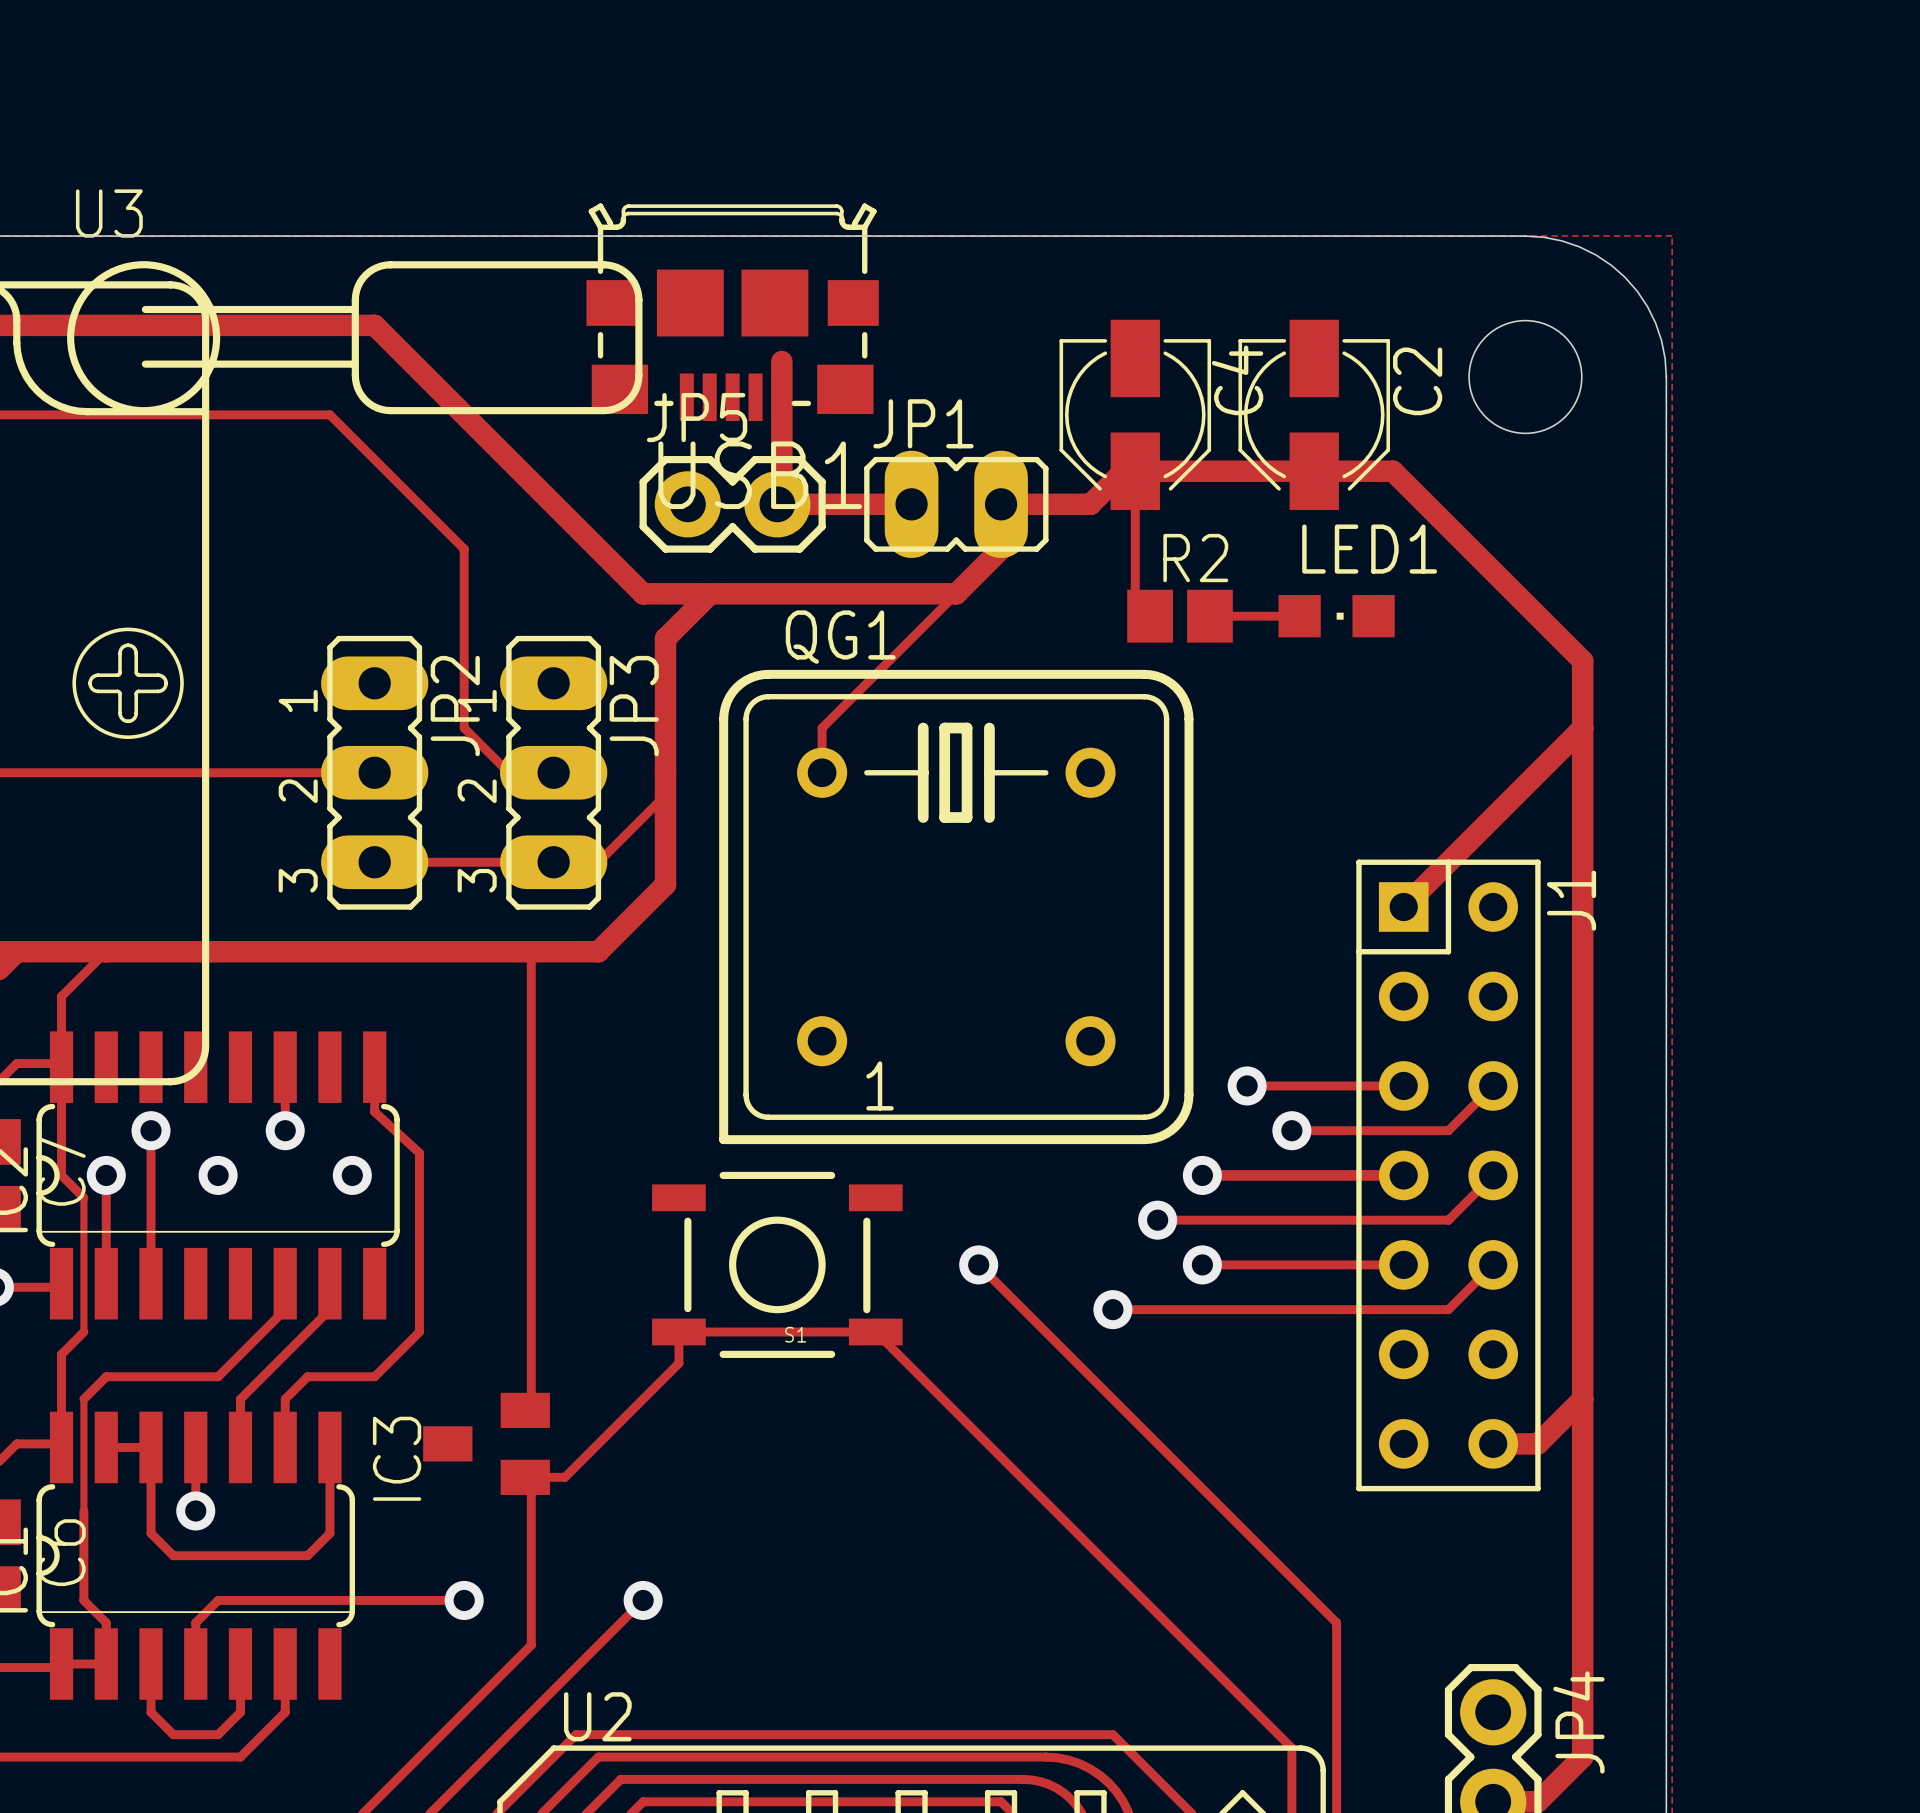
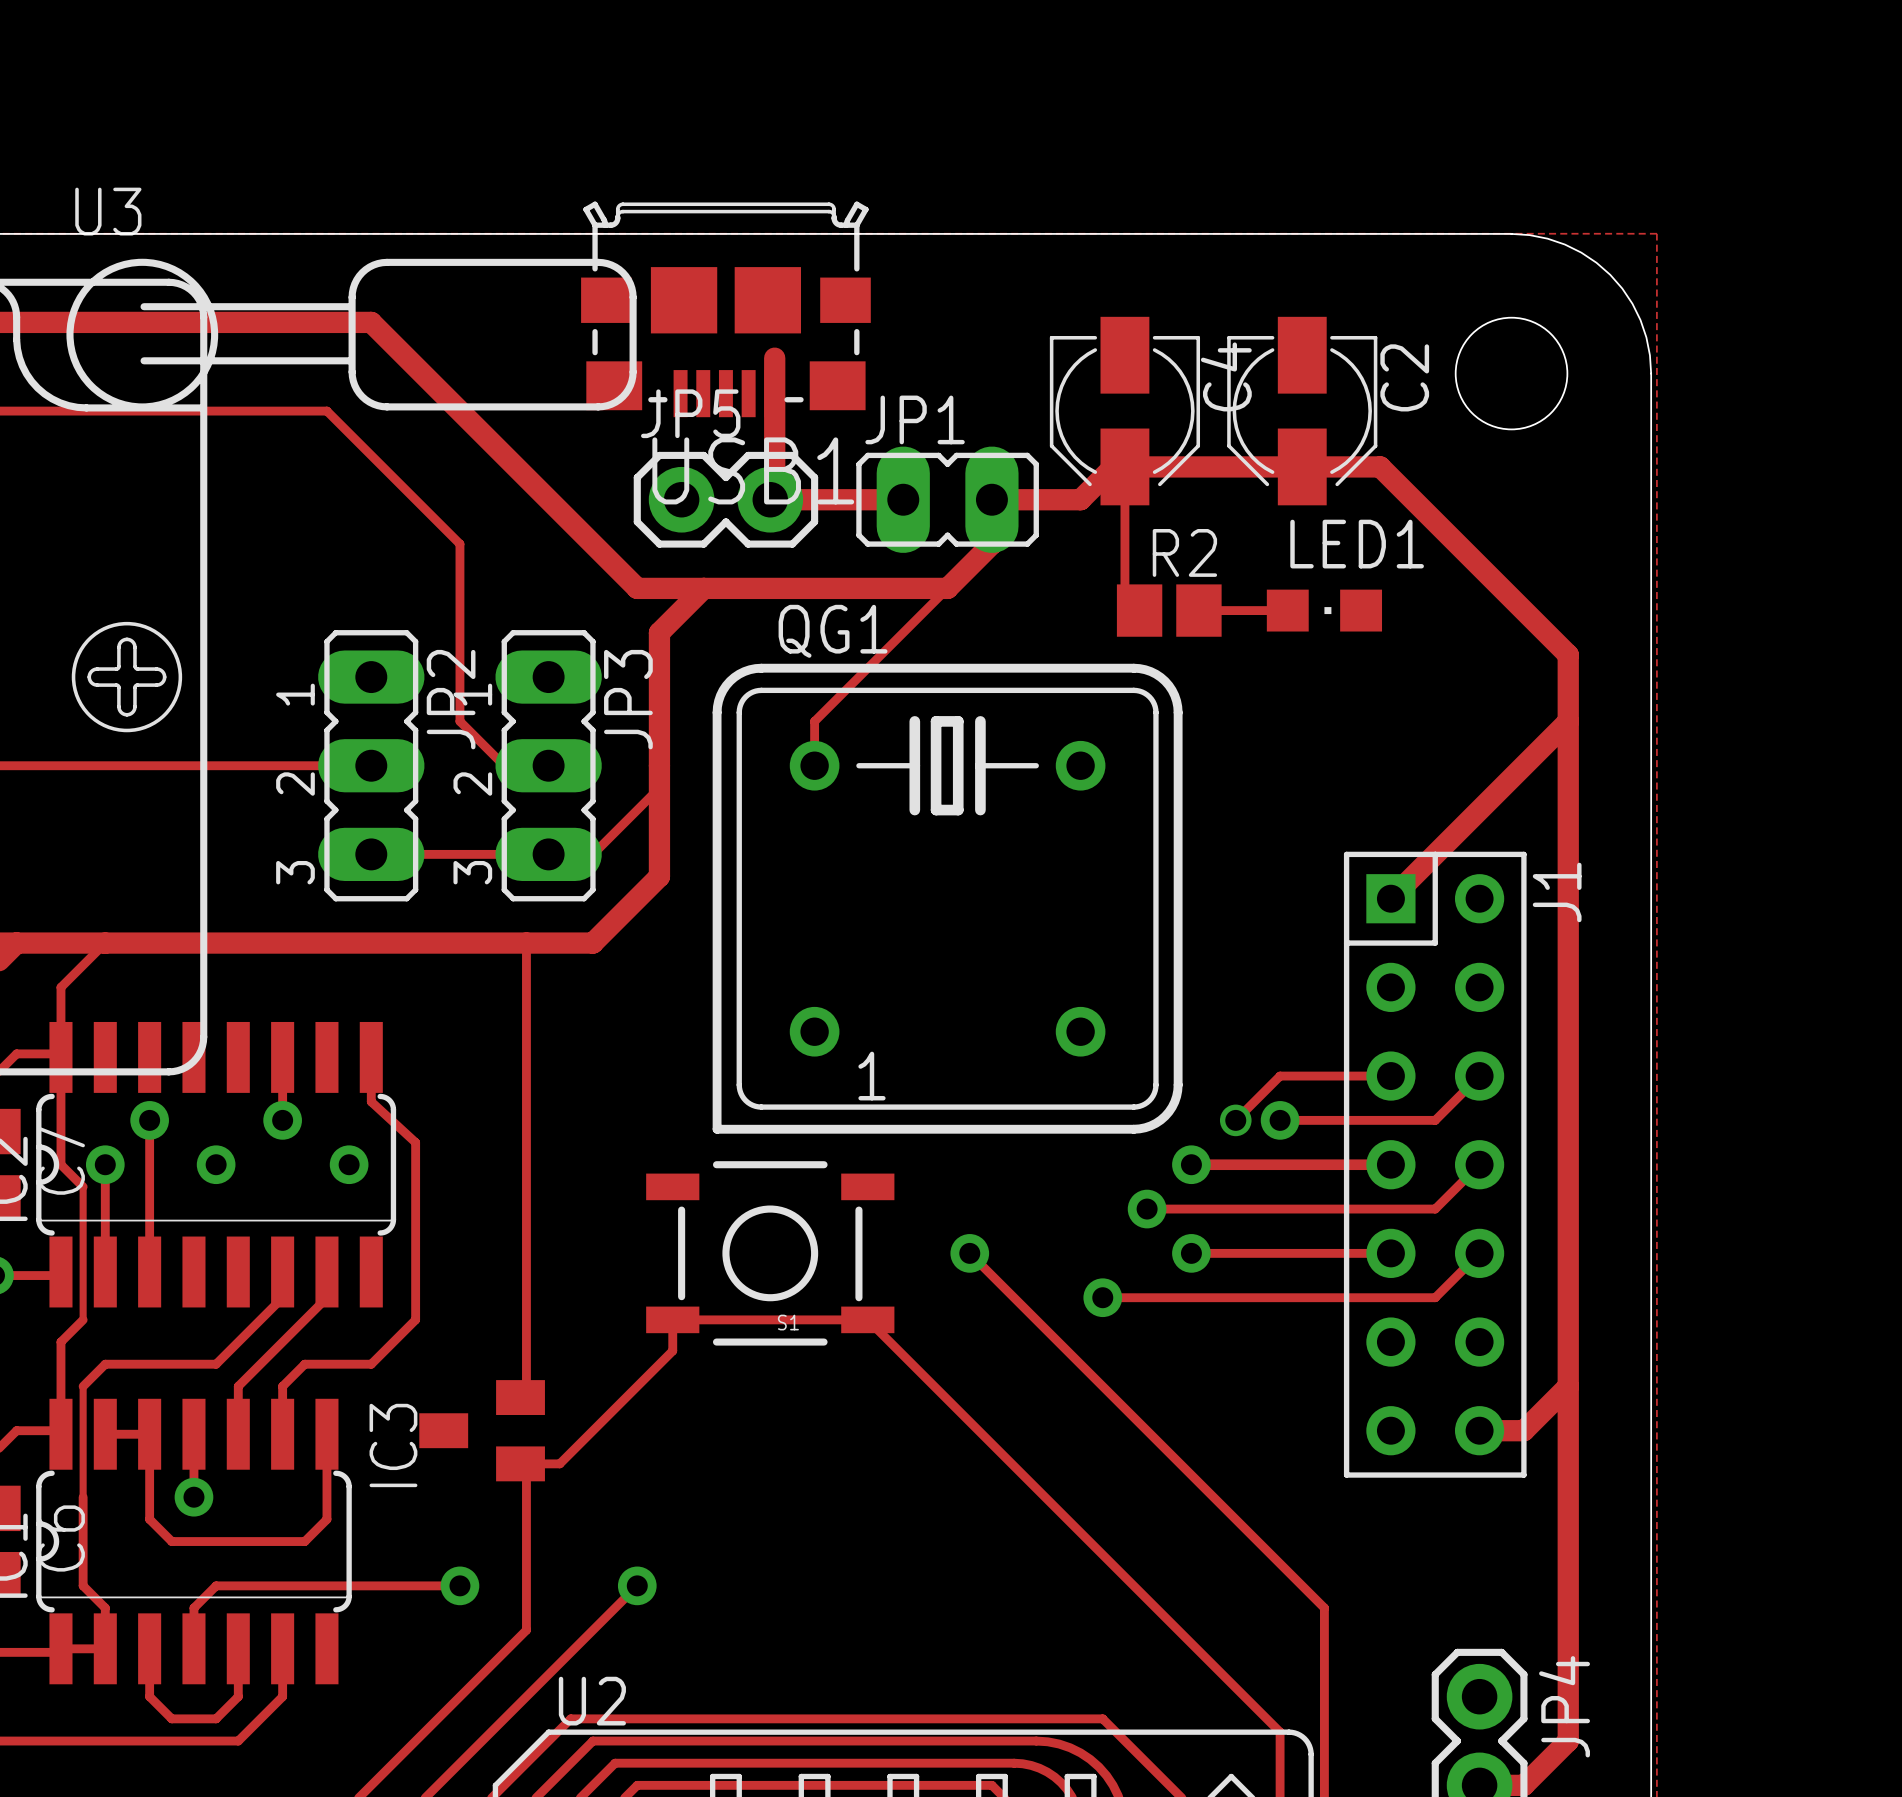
track: (1247, 1085) (1291, 1085) -> (1235, 1120) (1280, 1076)
via: (1247, 1085) -> none
via: none -> (1235, 1120)

